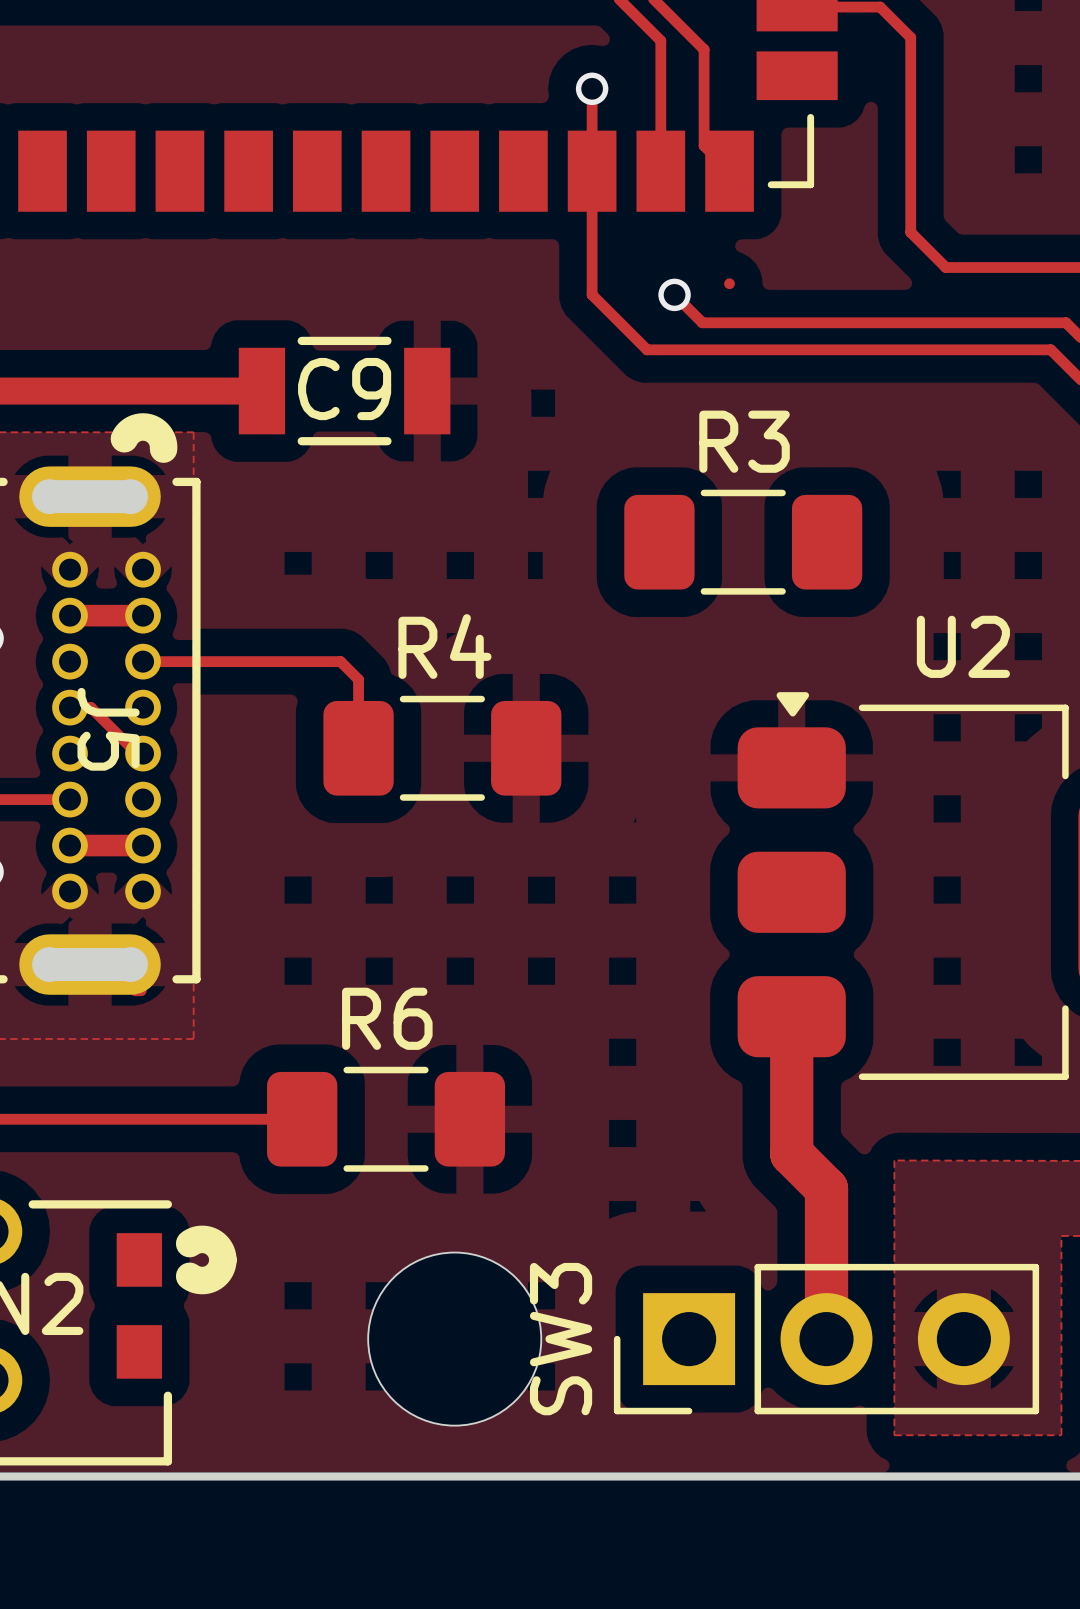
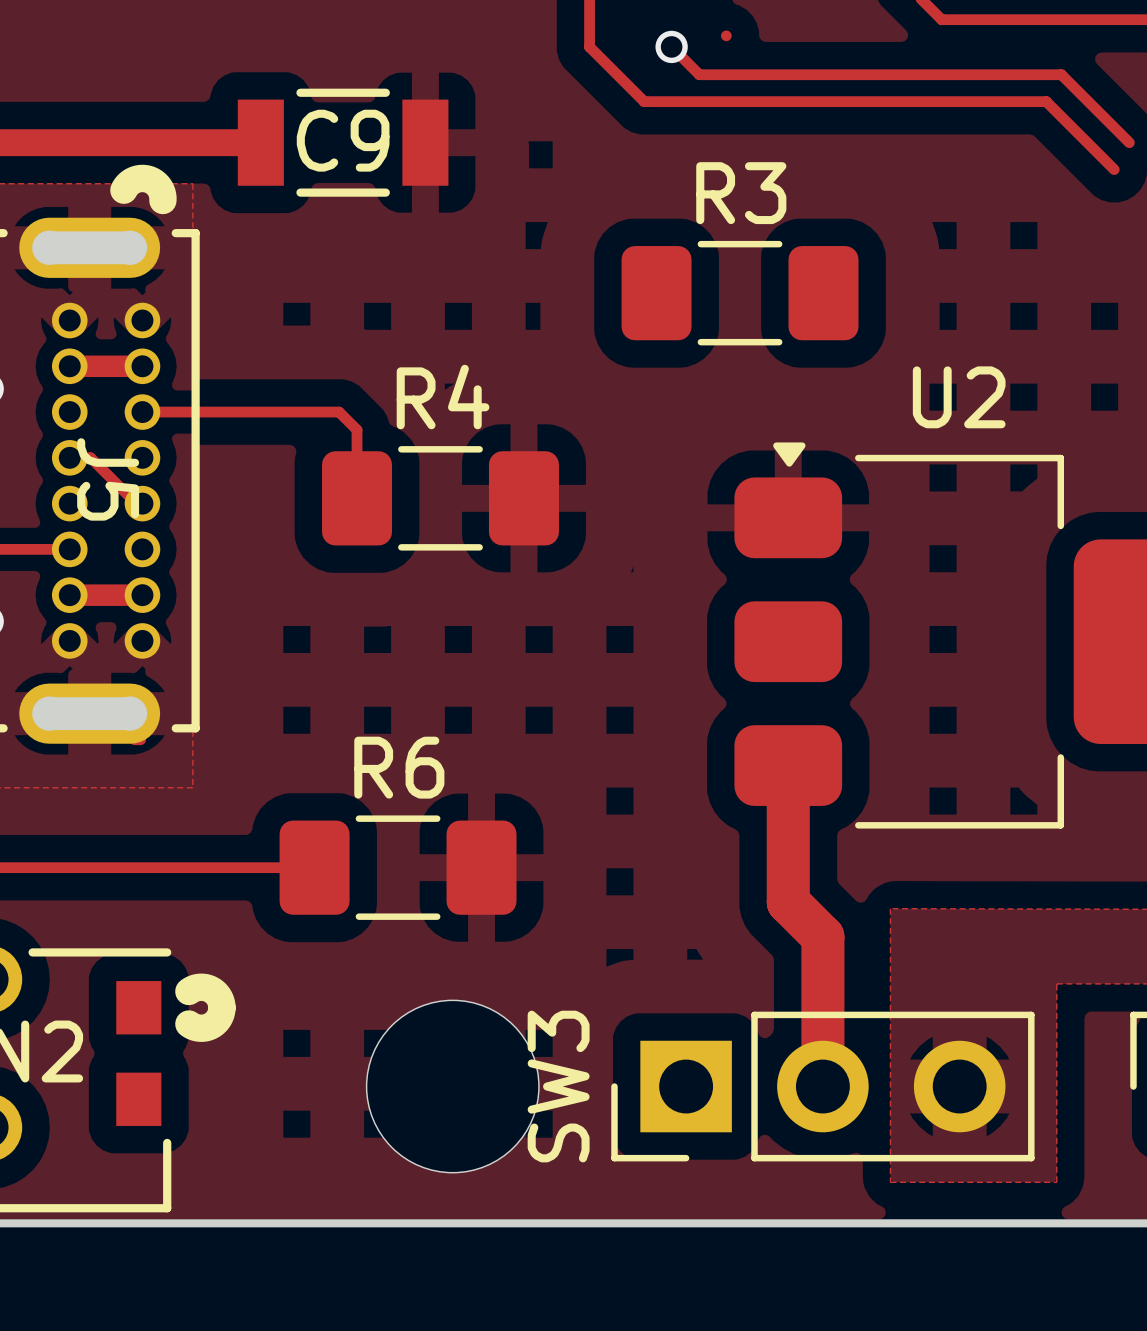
R6 position: (386, 1119) -> (398, 867)

